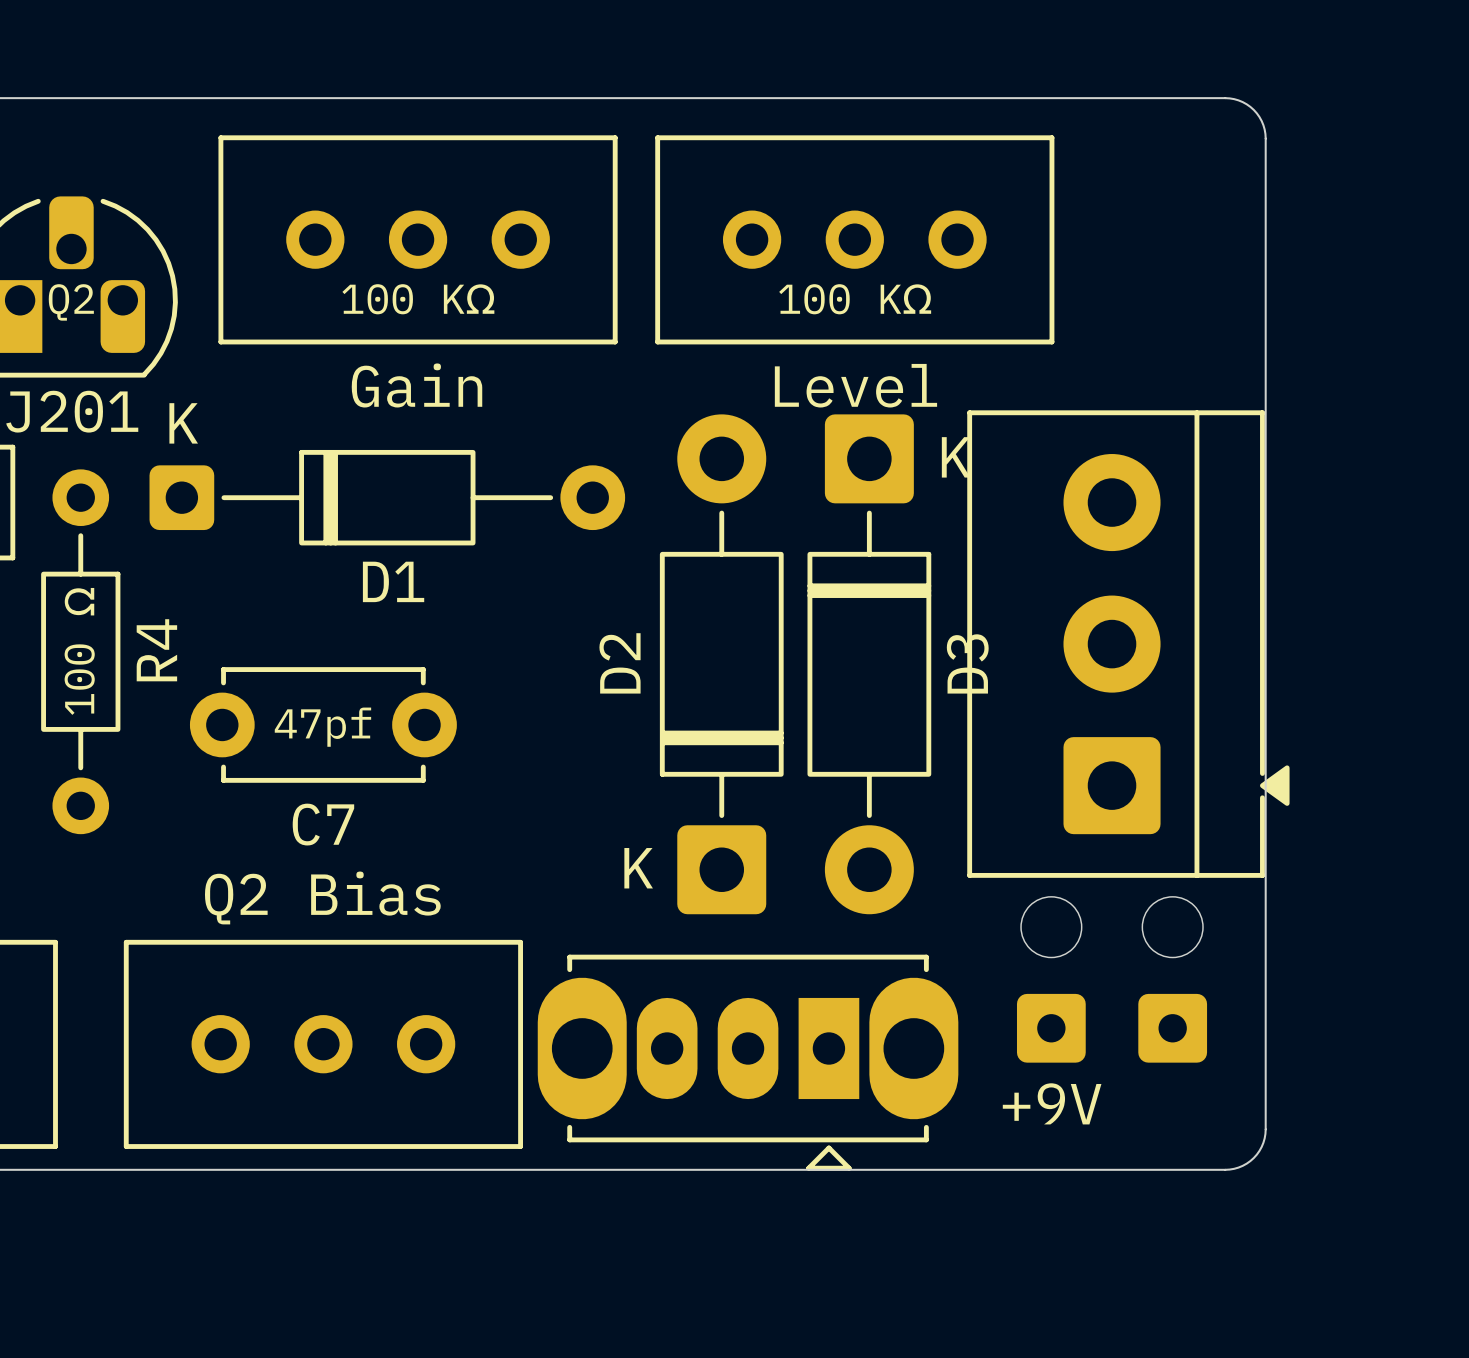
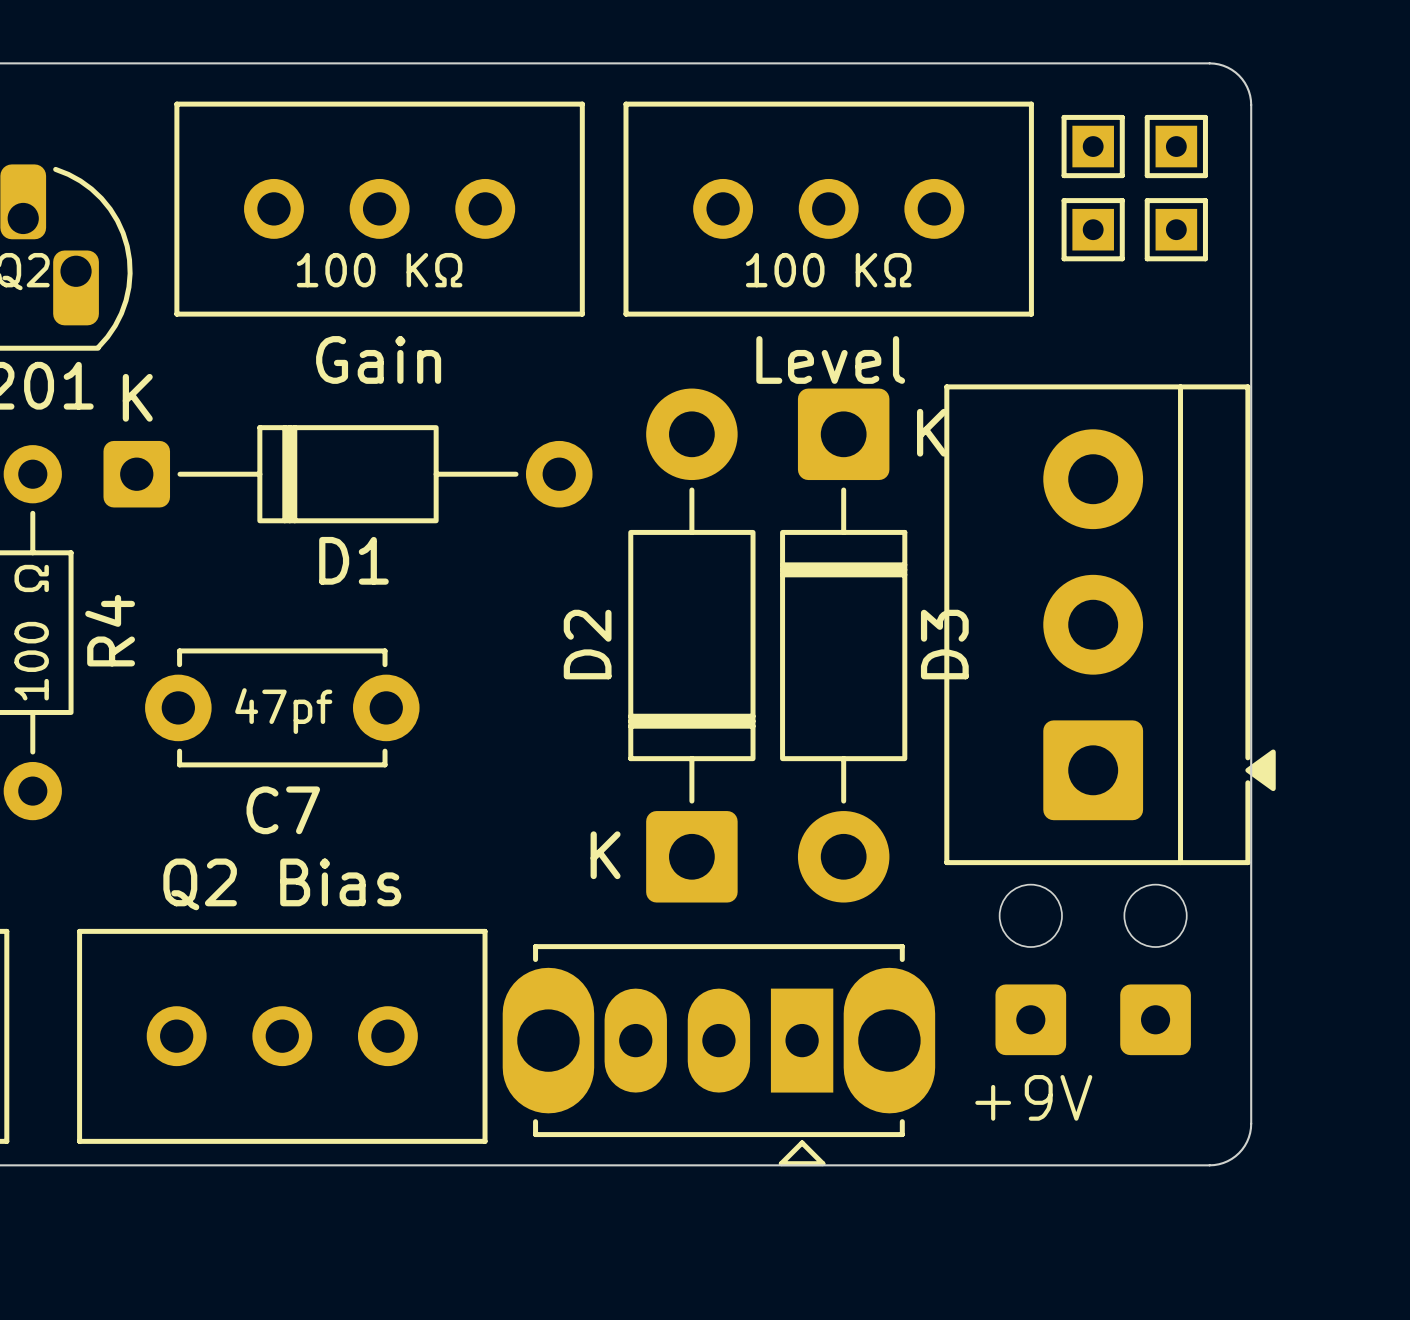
part: none -> (1093, 146)
part: none -> (1176, 146)
part: none -> (1093, 229)
part: none -> (1176, 229)

